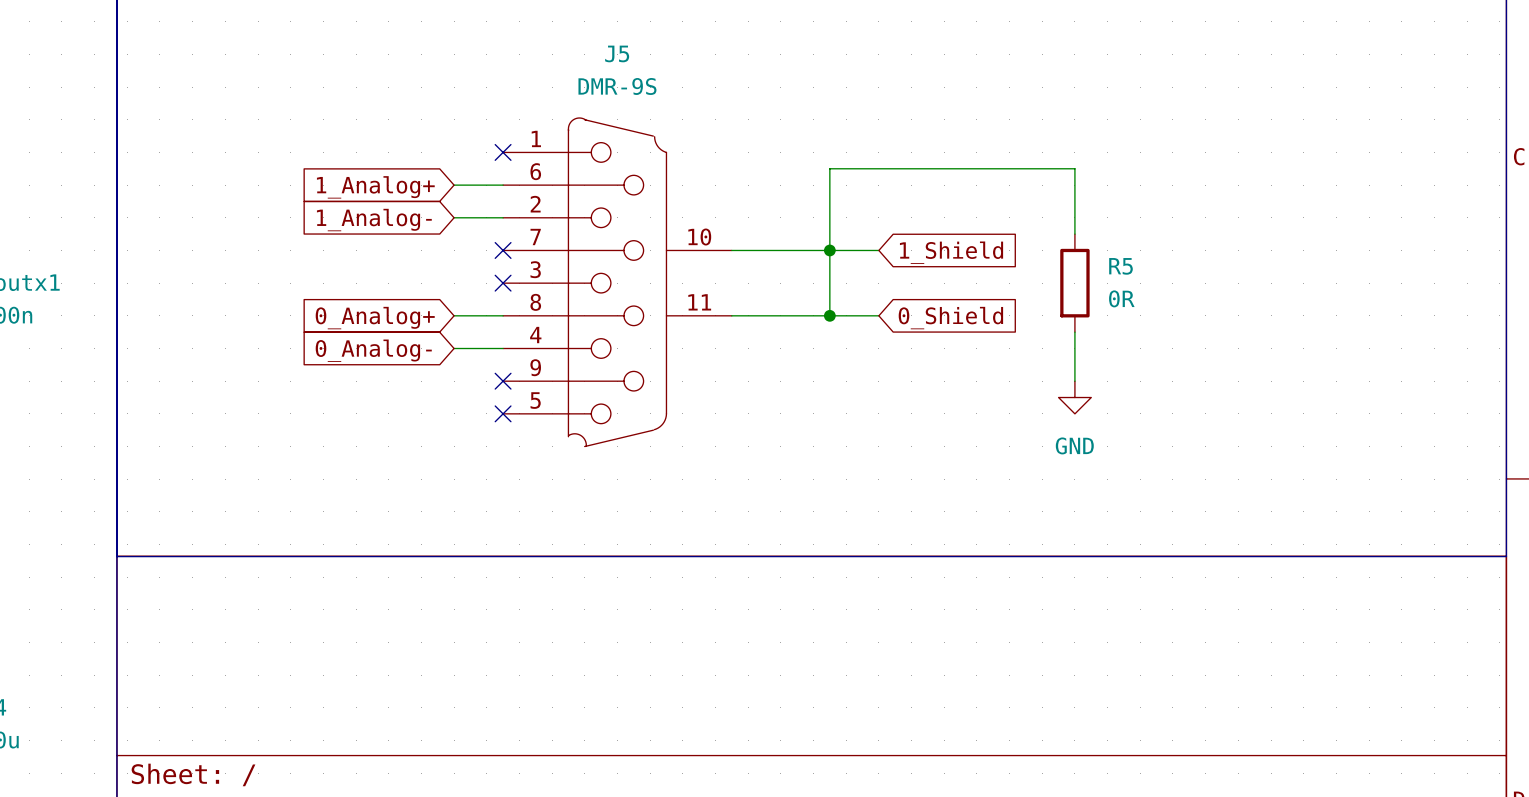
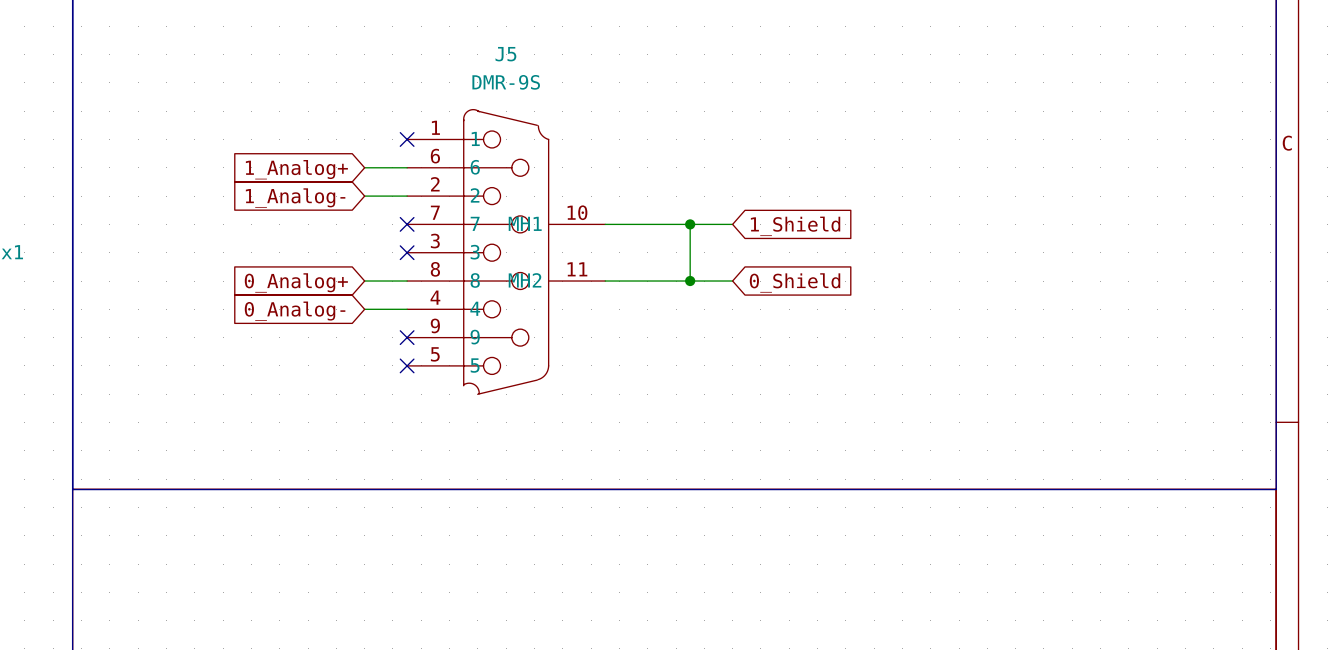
J5 symbol: [503, 118, 732, 447] -> [407, 109, 606, 395]
wire: (1074, 234) (1074, 168) (829, 168) (829, 250) -> none
R5: 0R (1074, 283) -> none
wire: (1074, 332) (1074, 381) -> none
power symbol: GND (1074, 397) -> none

